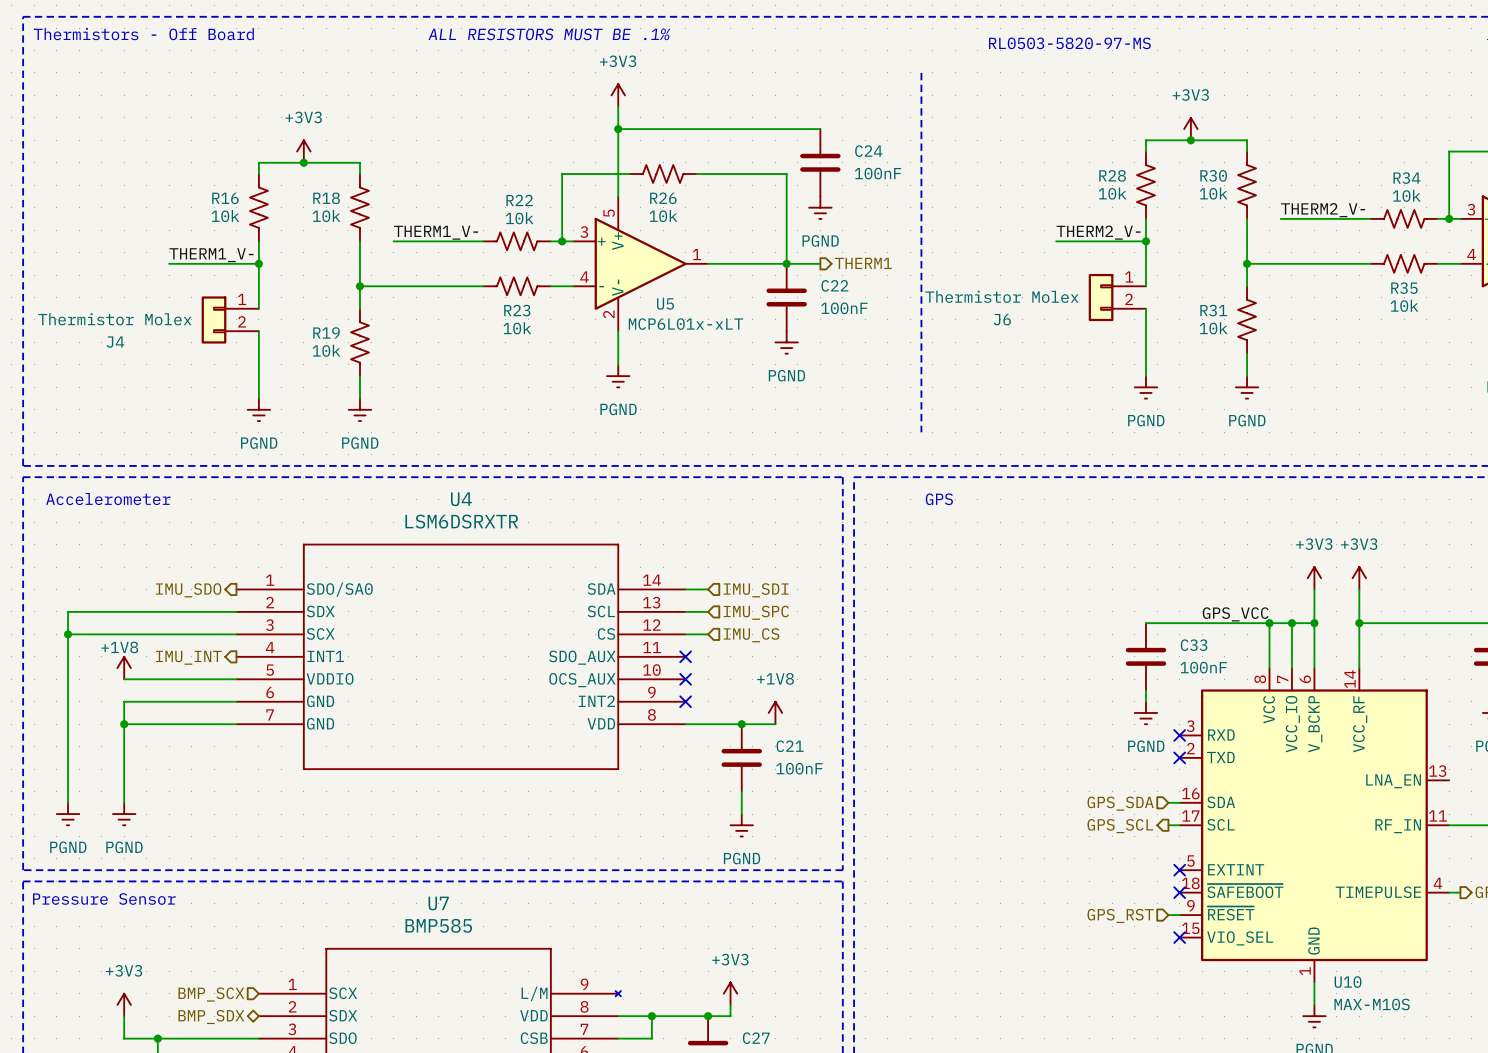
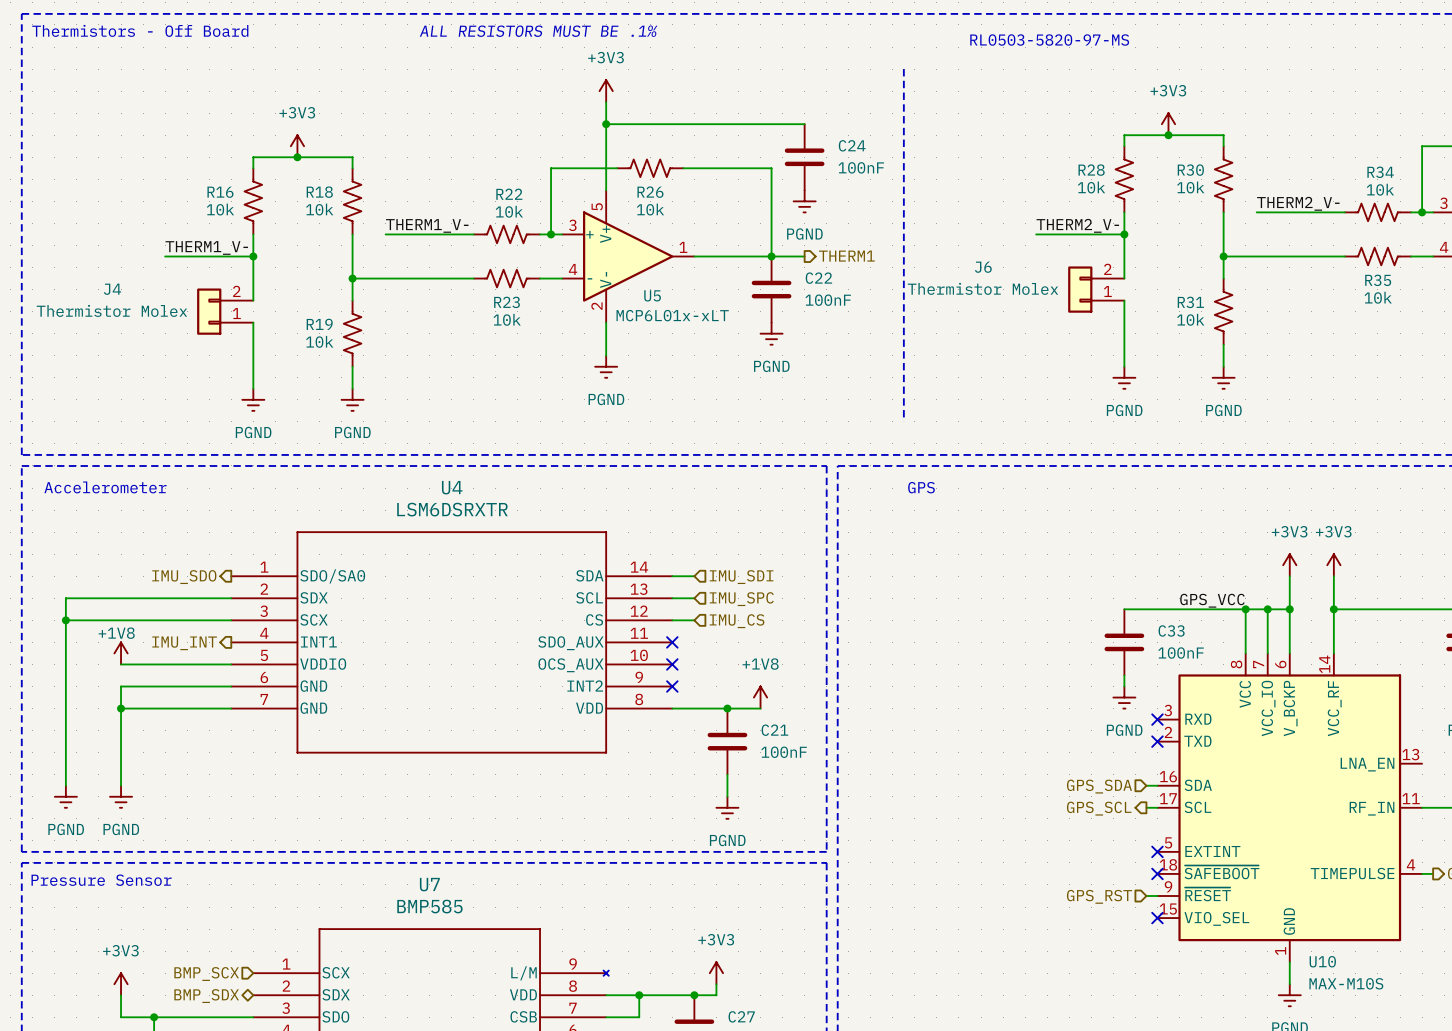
J6 flip: as is (1101, 297) -> up-down (1080, 289)
J4 flip: as is (214, 319) -> up-down (209, 311)

